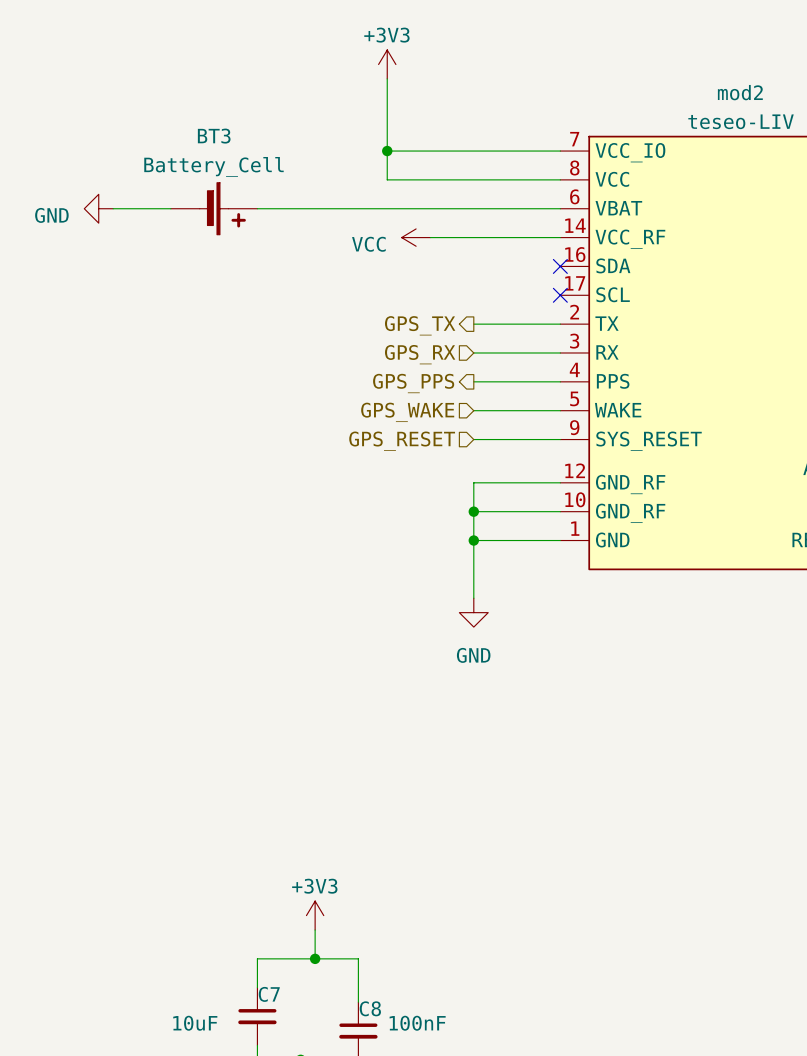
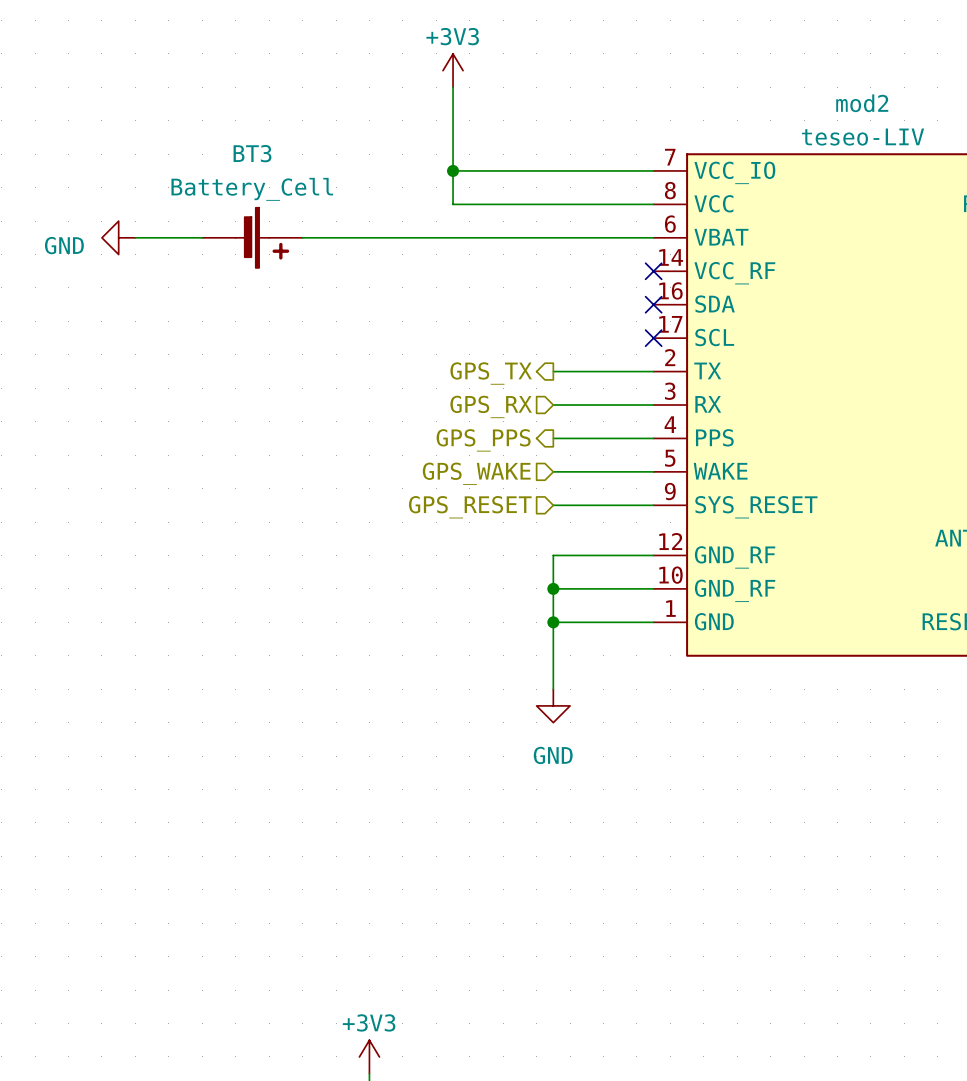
power symbol: VCC (416, 237) -> none
wire: (430, 237) (560, 237) -> none
no-connect mark: none -> (653, 271)

